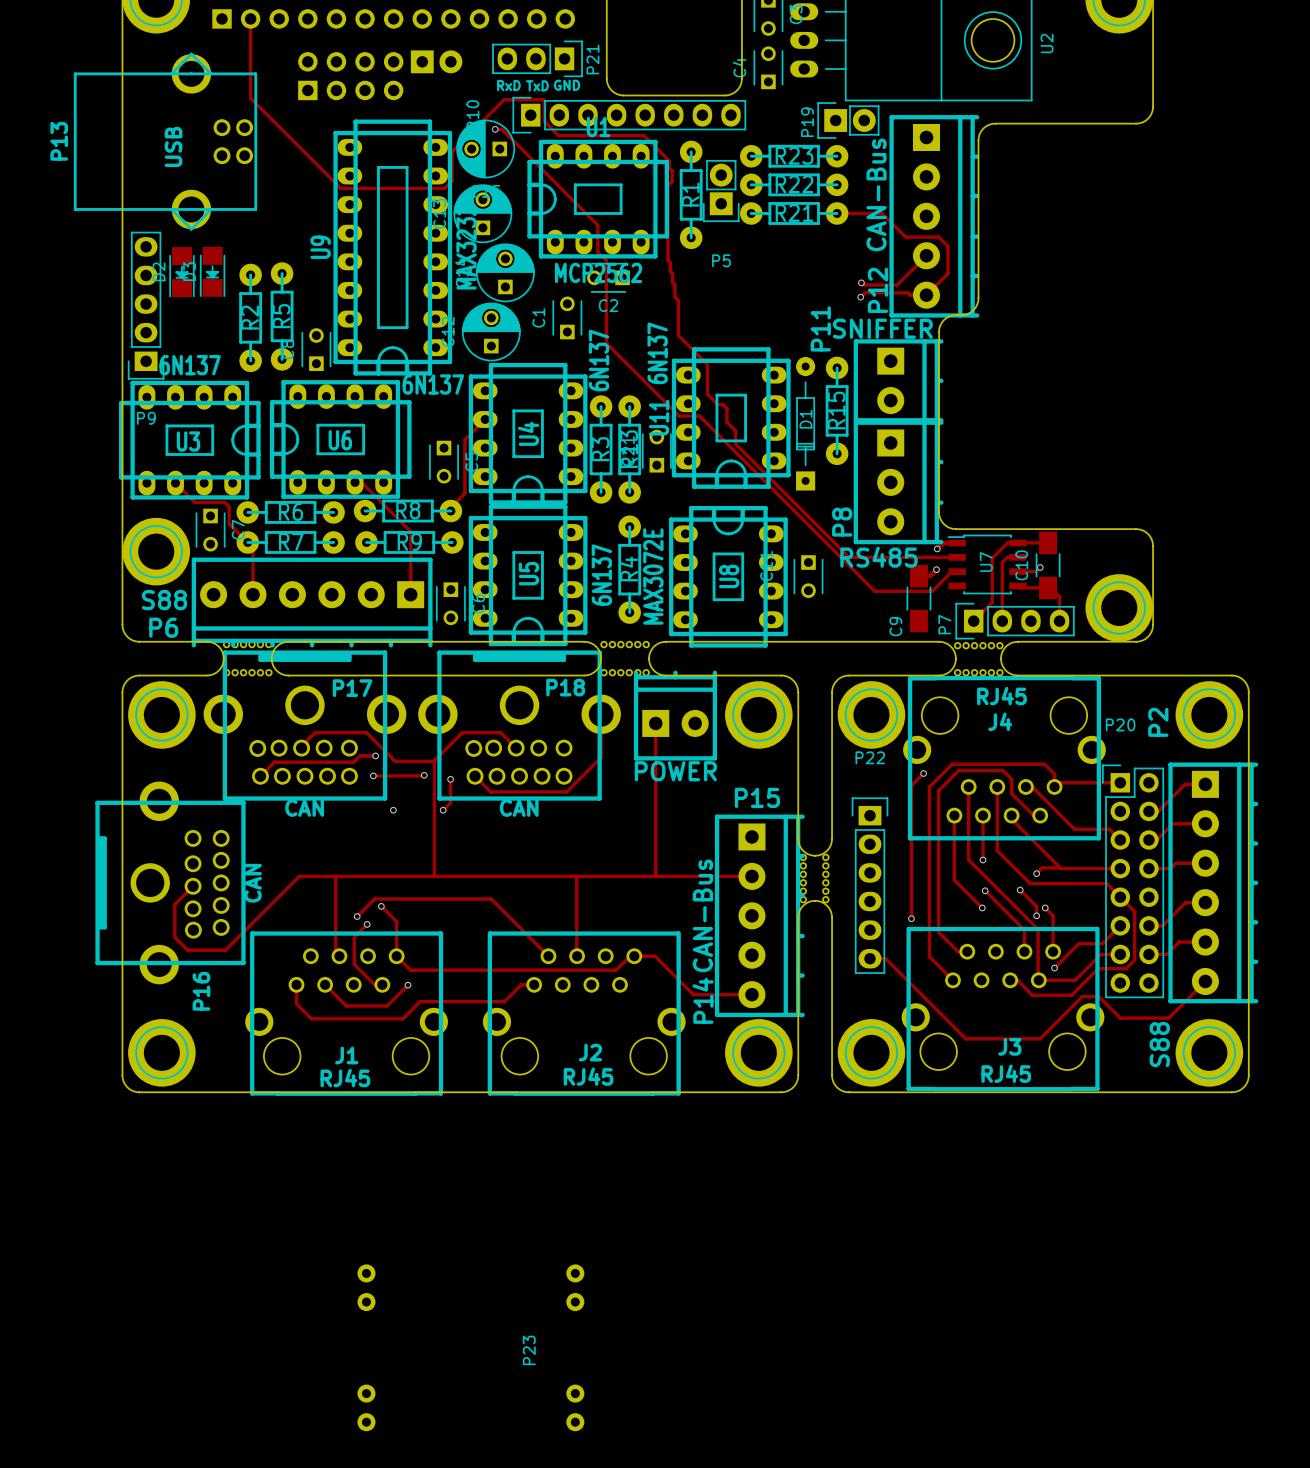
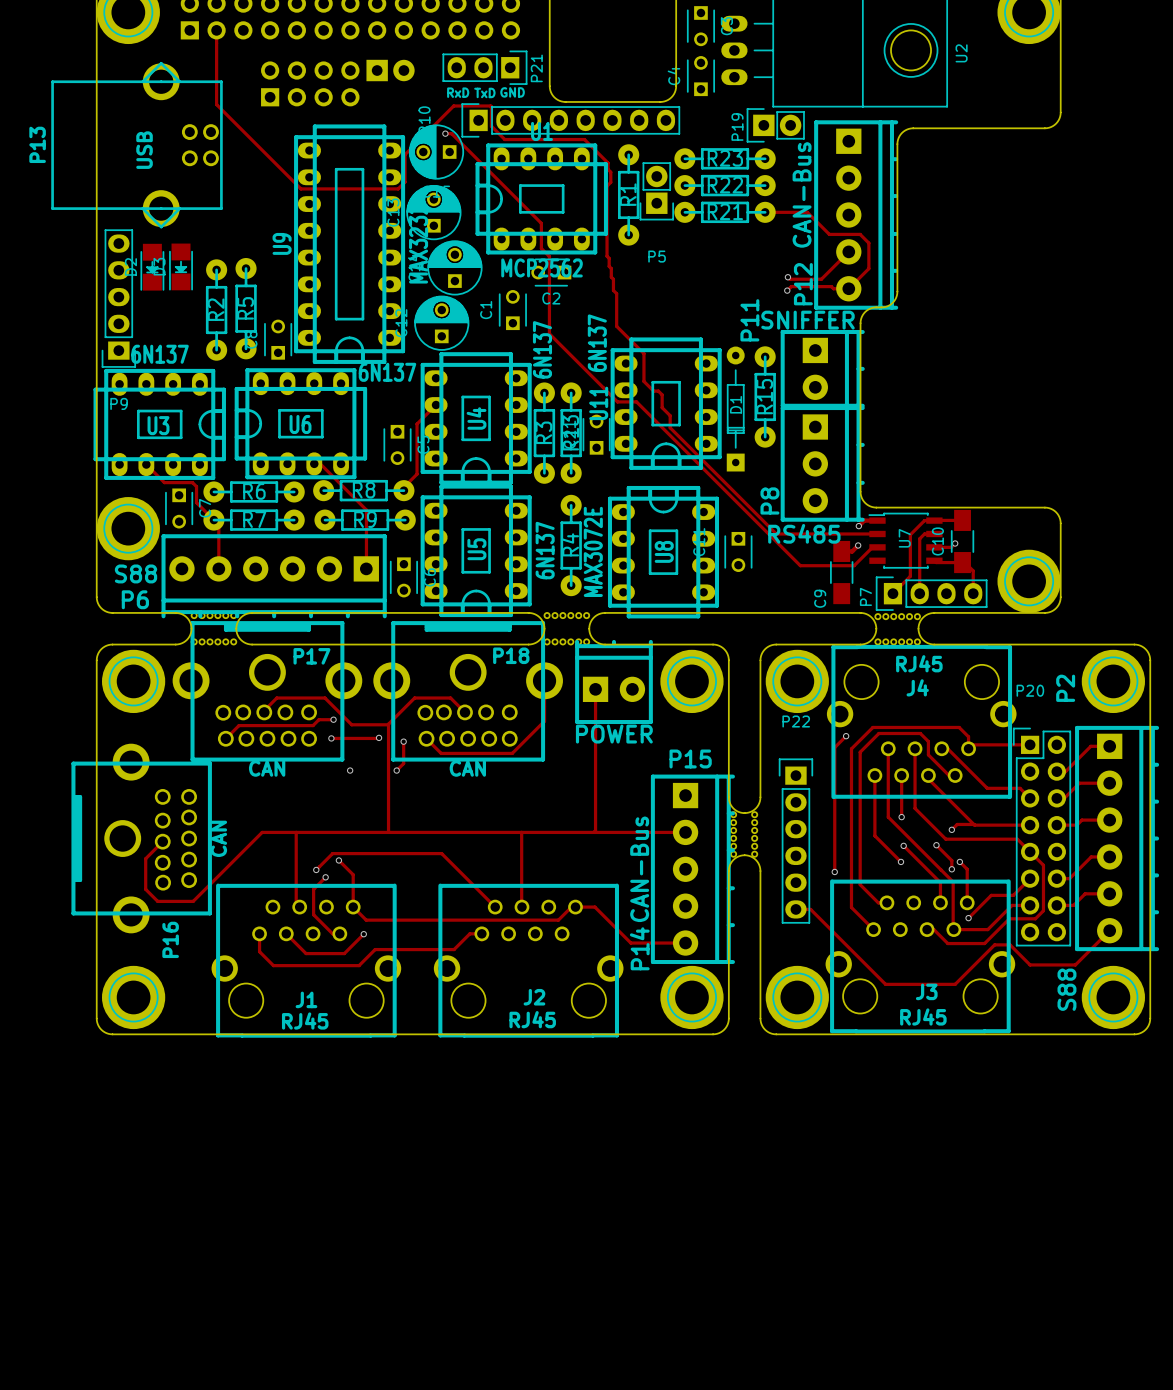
P23: (470, 1347) -> none

